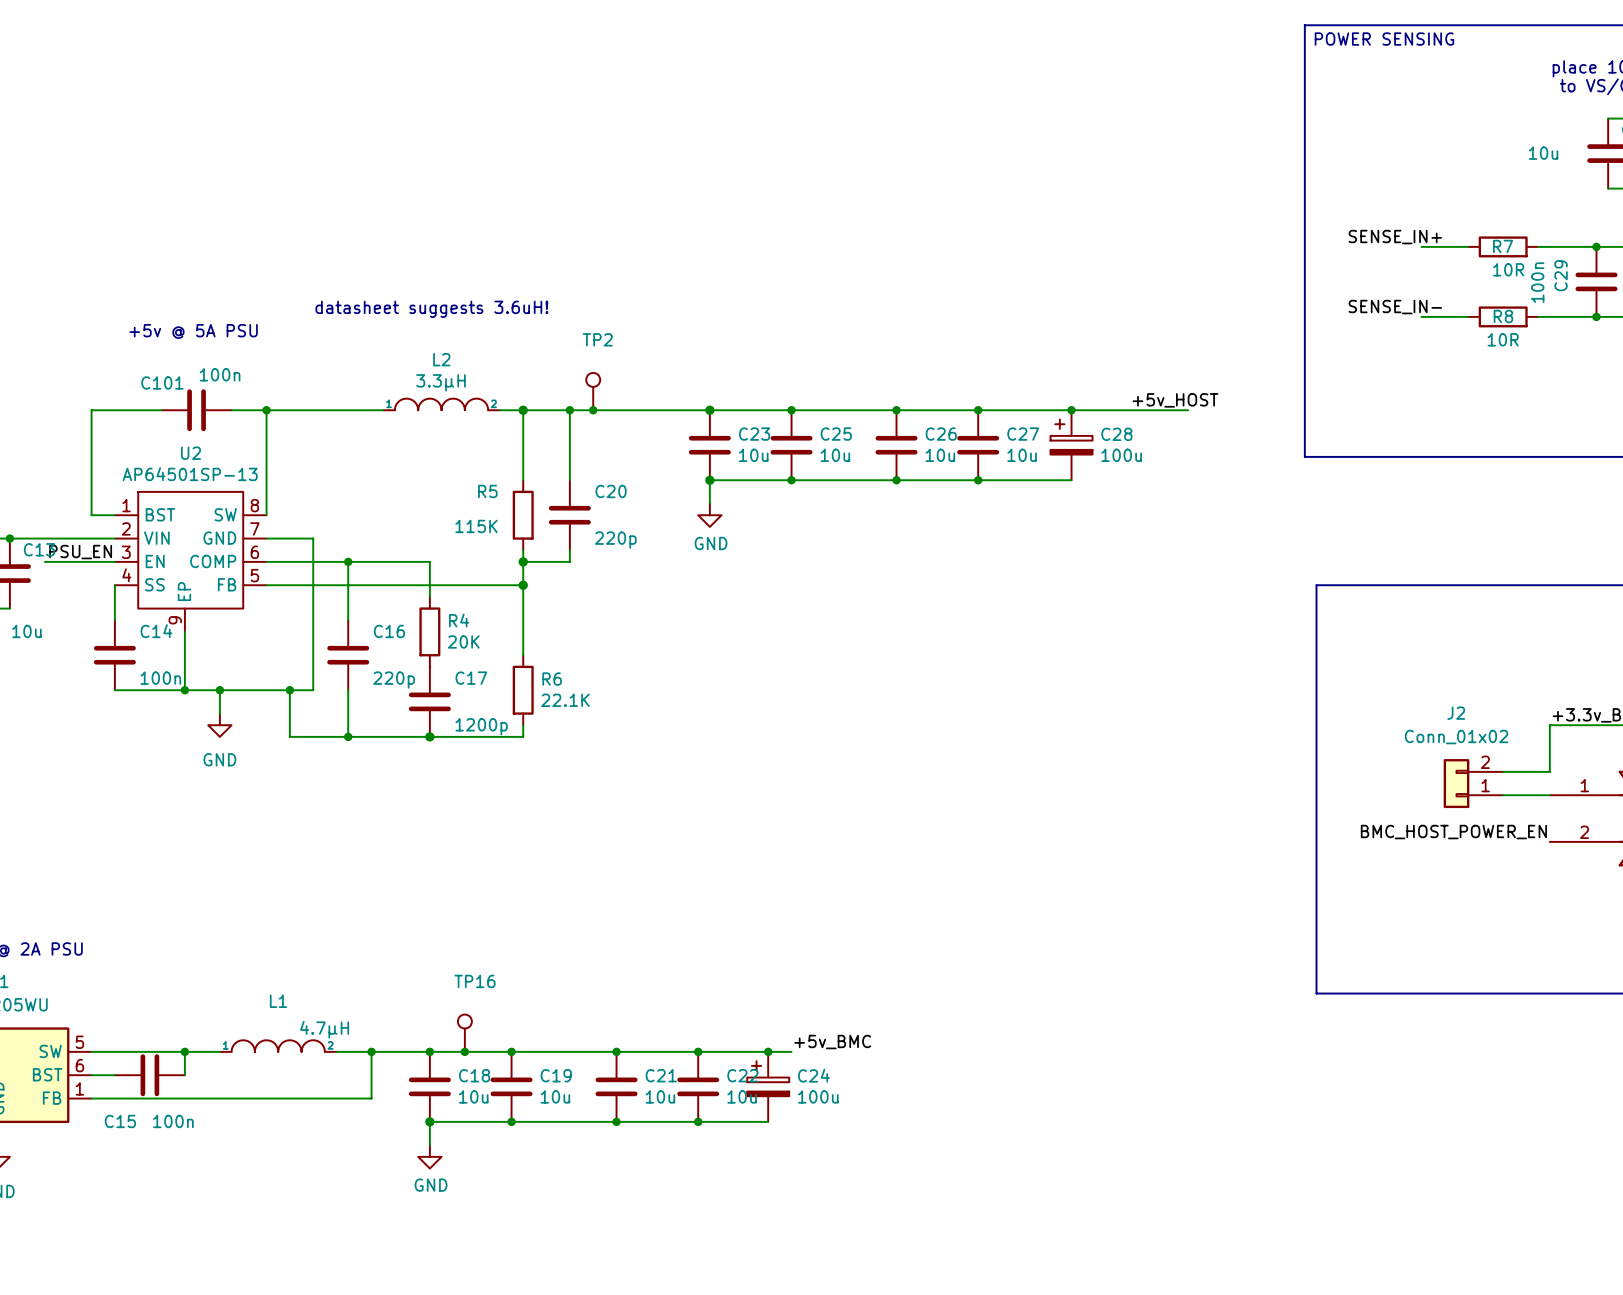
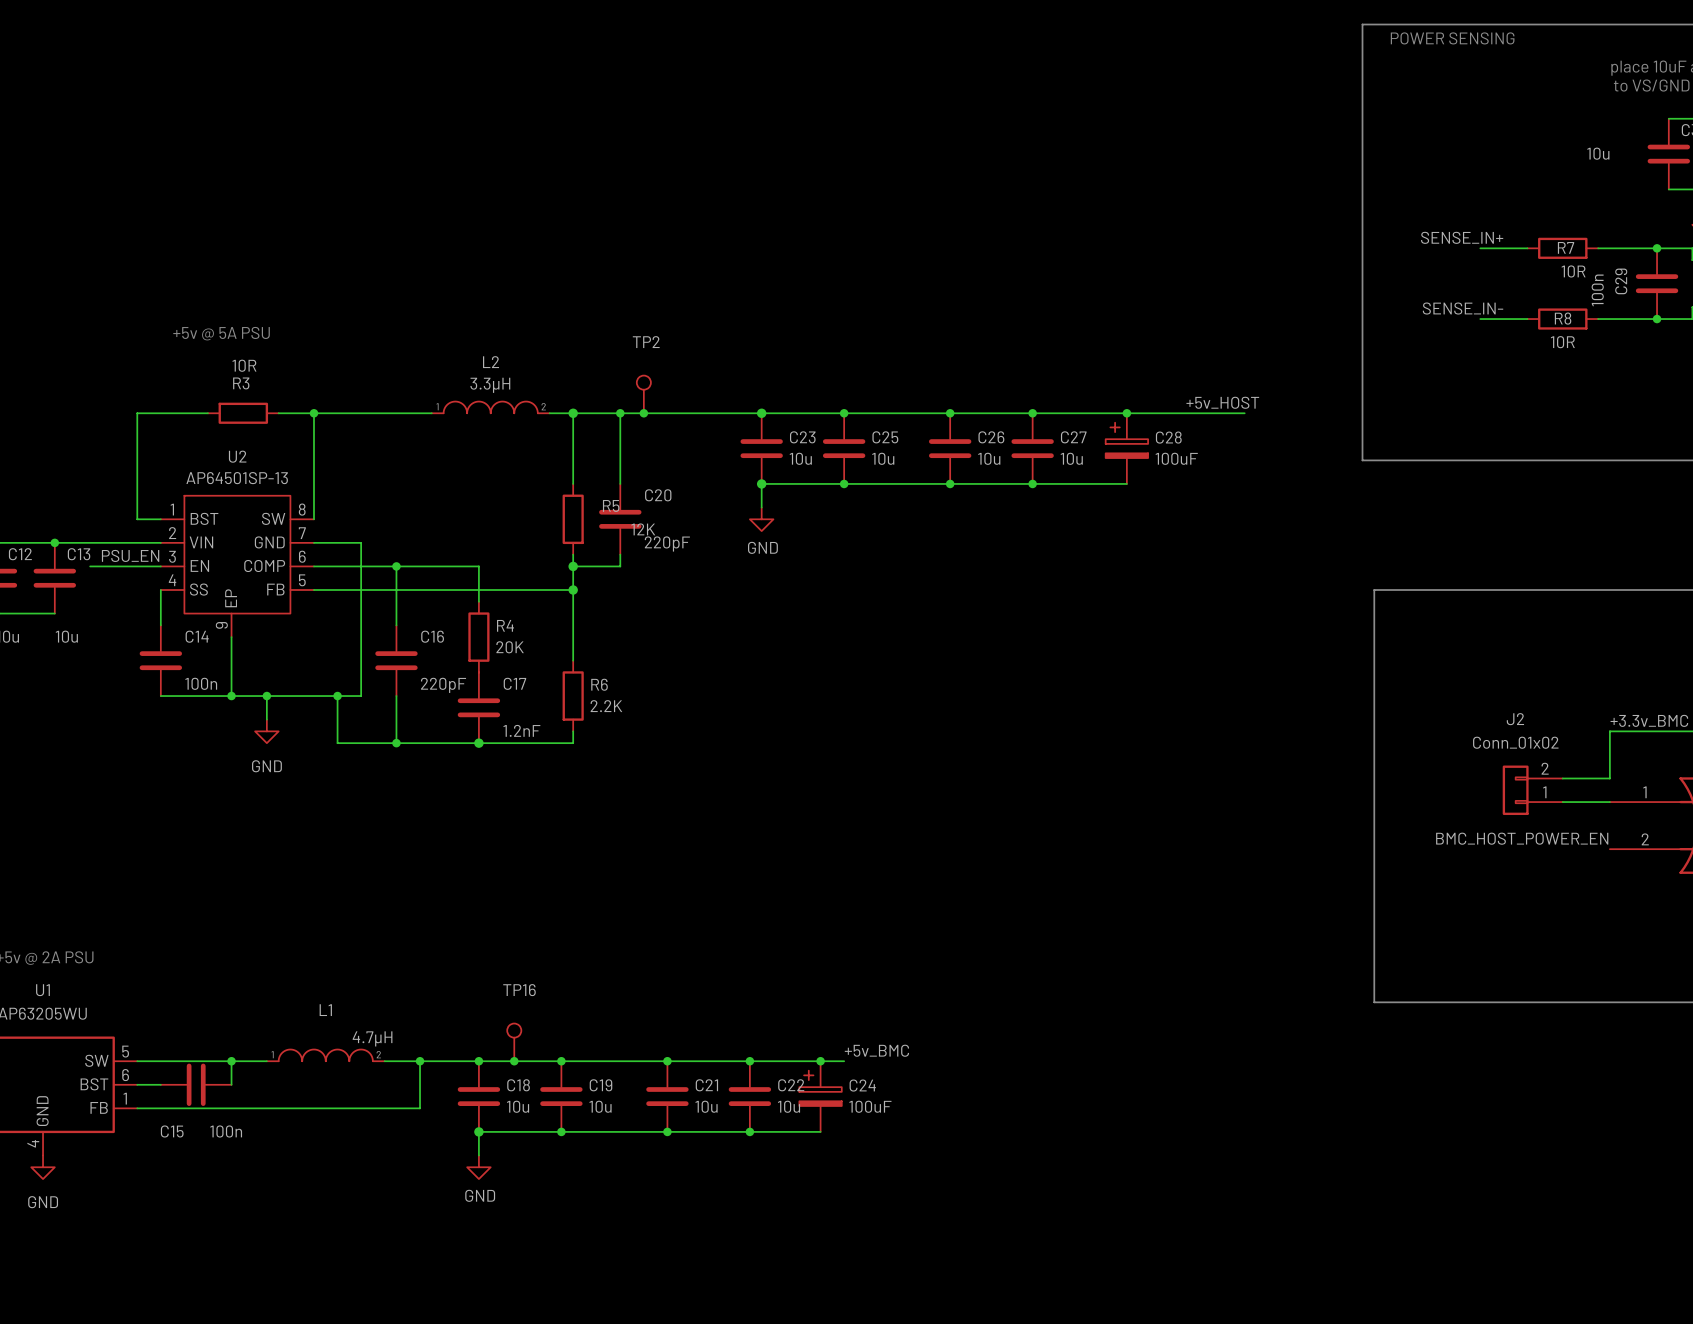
text: datasheet suggests 3.6uH! (431, 309) -> none
C101: 100n (196, 410) -> none
R3: none -> 10R (243, 413)
C28 value: 100u (1121, 455) -> 100uF (1176, 458)
R5 name position: R5 (487, 491) -> R5 (611, 505)
R5 value: 115K (476, 526) -> 12K (643, 529)
C20 value: 220p (615, 540) -> 220pF (667, 543)
C16 value: 220p (394, 680) -> 220pF (443, 685)
R6 value: 22.1K (565, 700) -> 2.2K (606, 706)
C17 value: 1200p (481, 726) -> 1.2nF (521, 730)
C24 value: 100u (818, 1096) -> 100uF (870, 1106)

